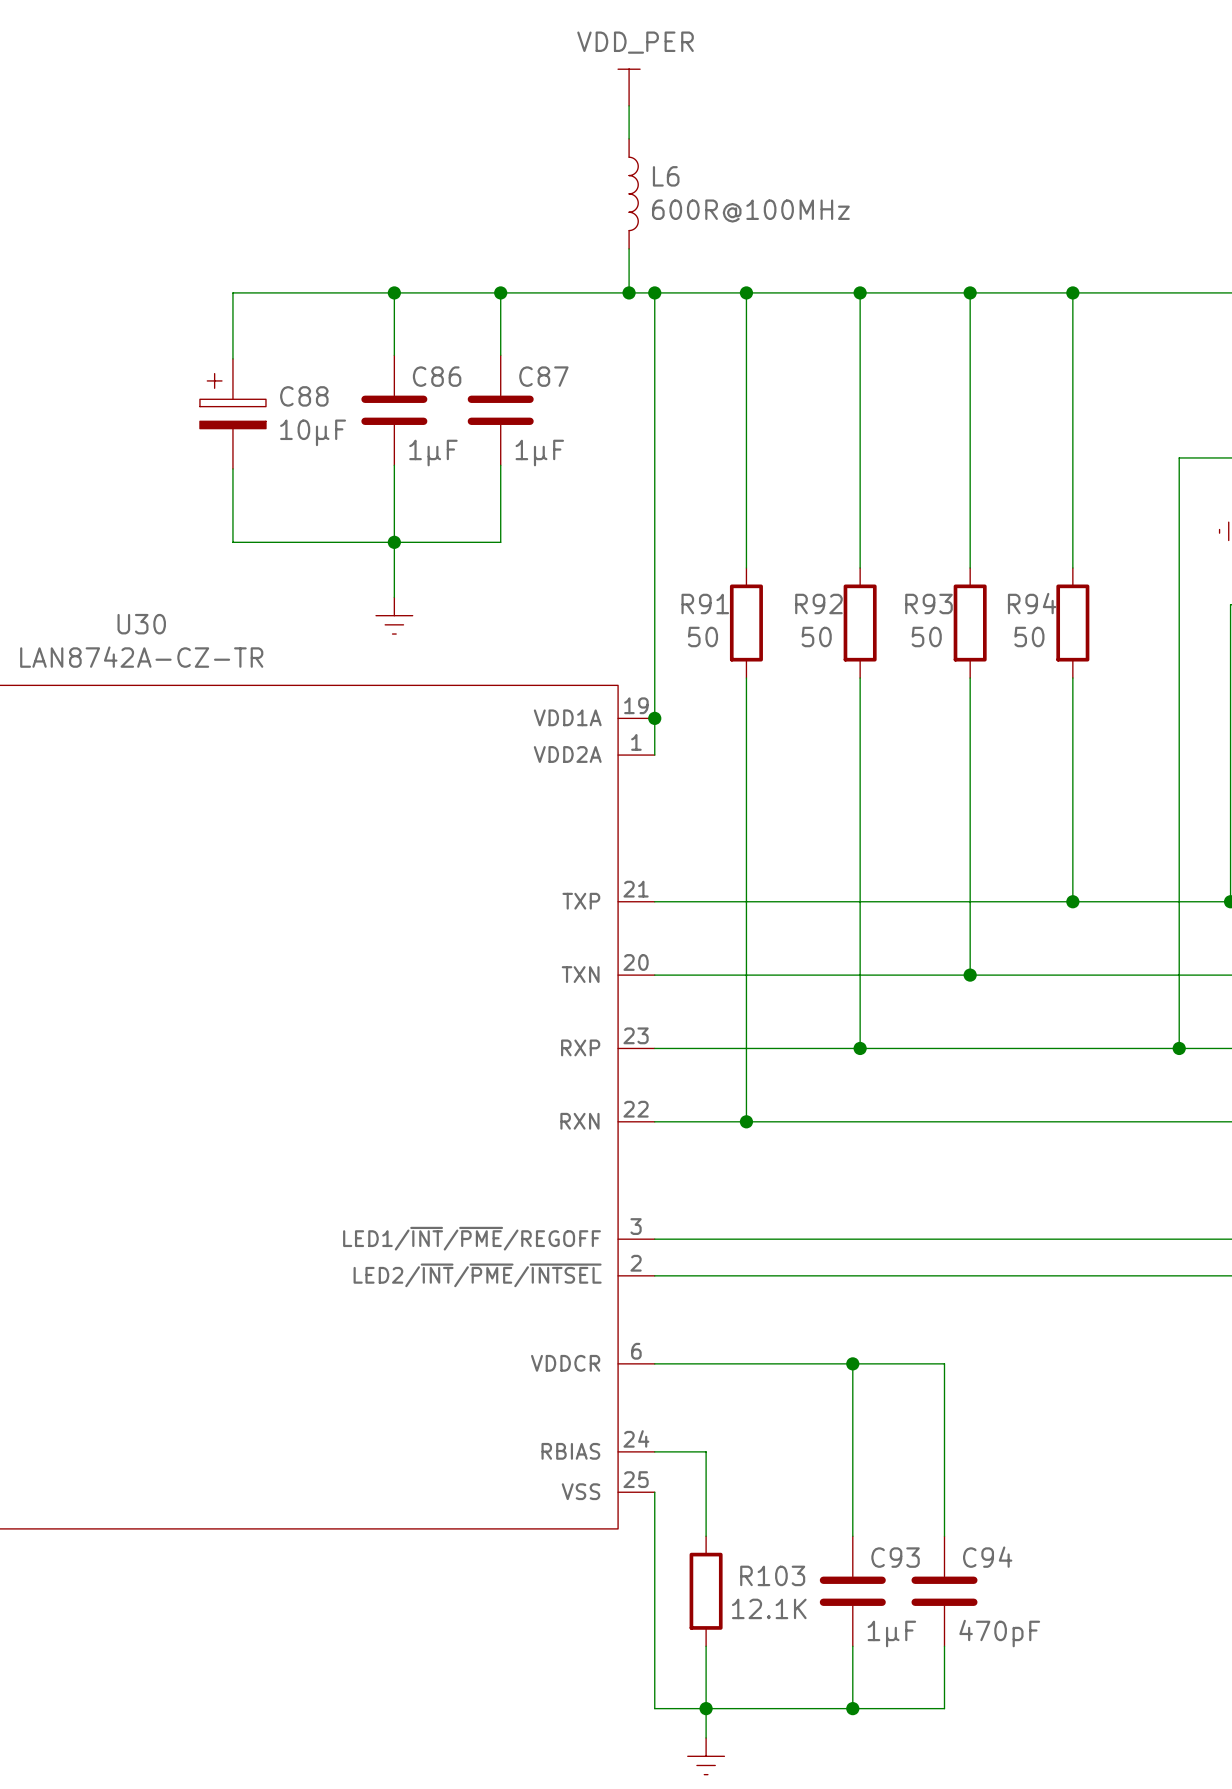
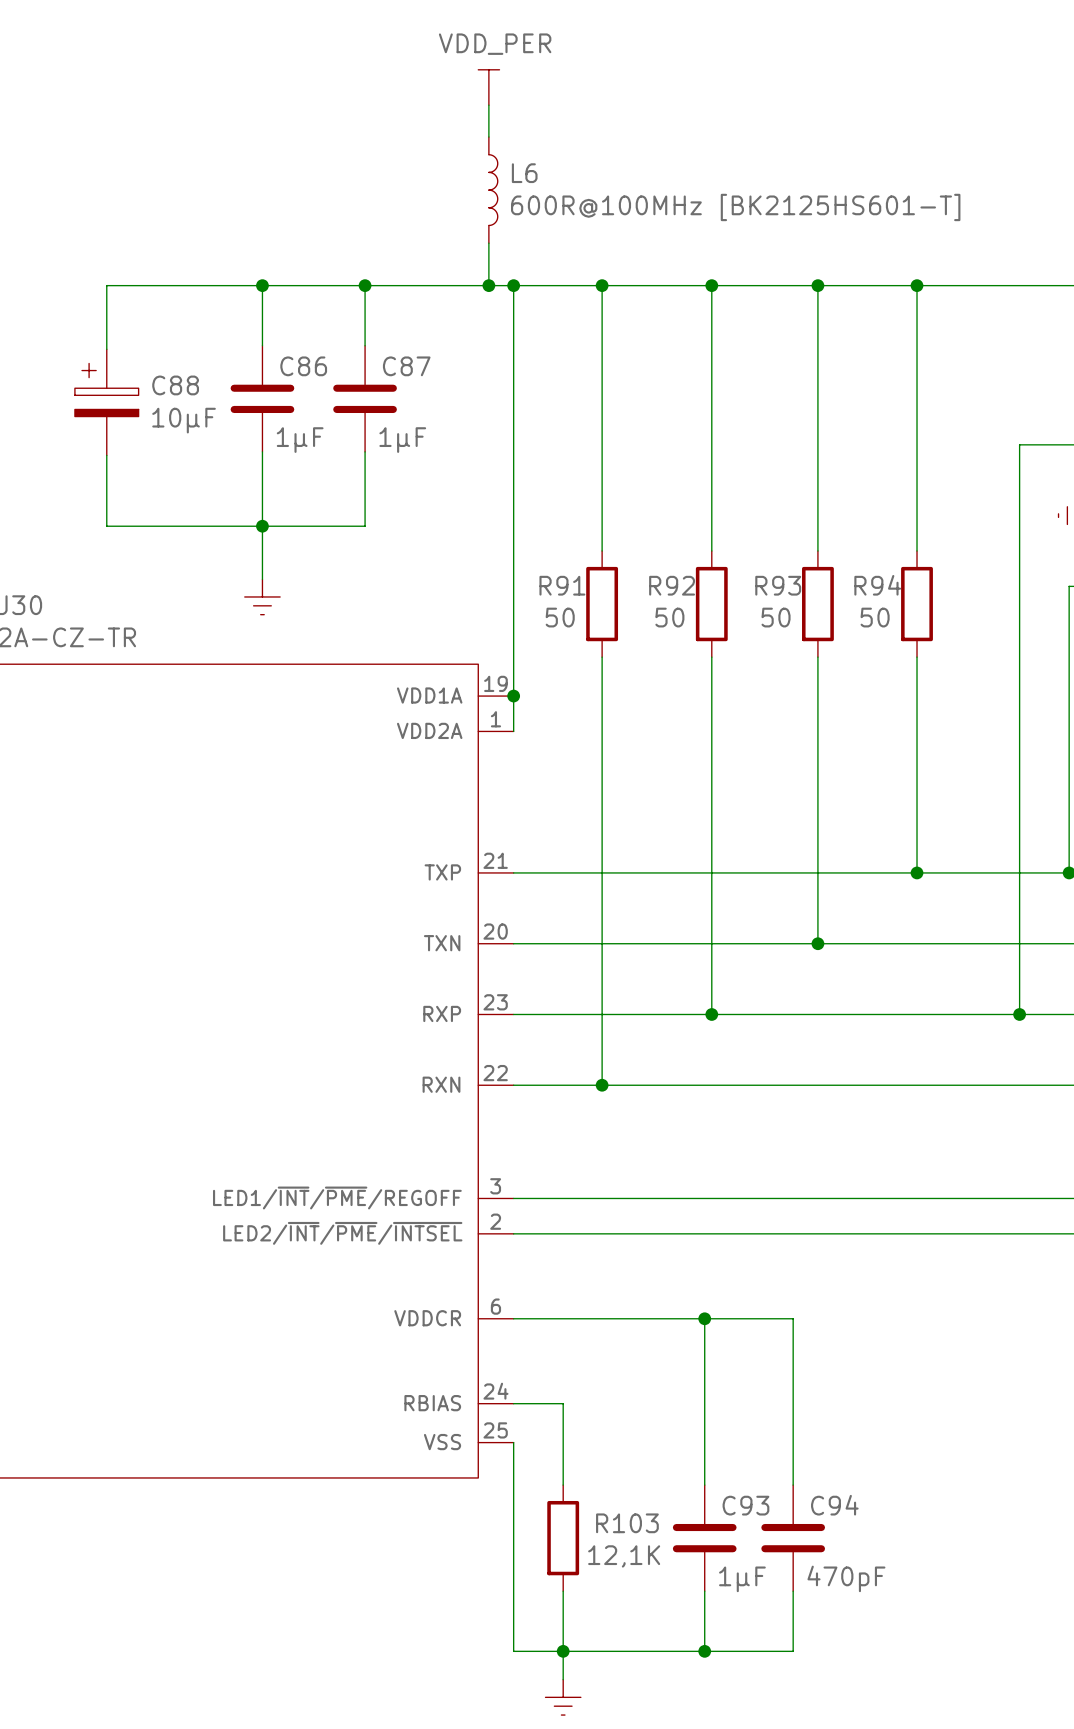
L6 value: 600R@100MHz (750, 211) -> 600R@100MHz [BK2125HS601-T] (735, 207)
R103 value: 12.1K (769, 1608) -> 12,1K (624, 1556)

